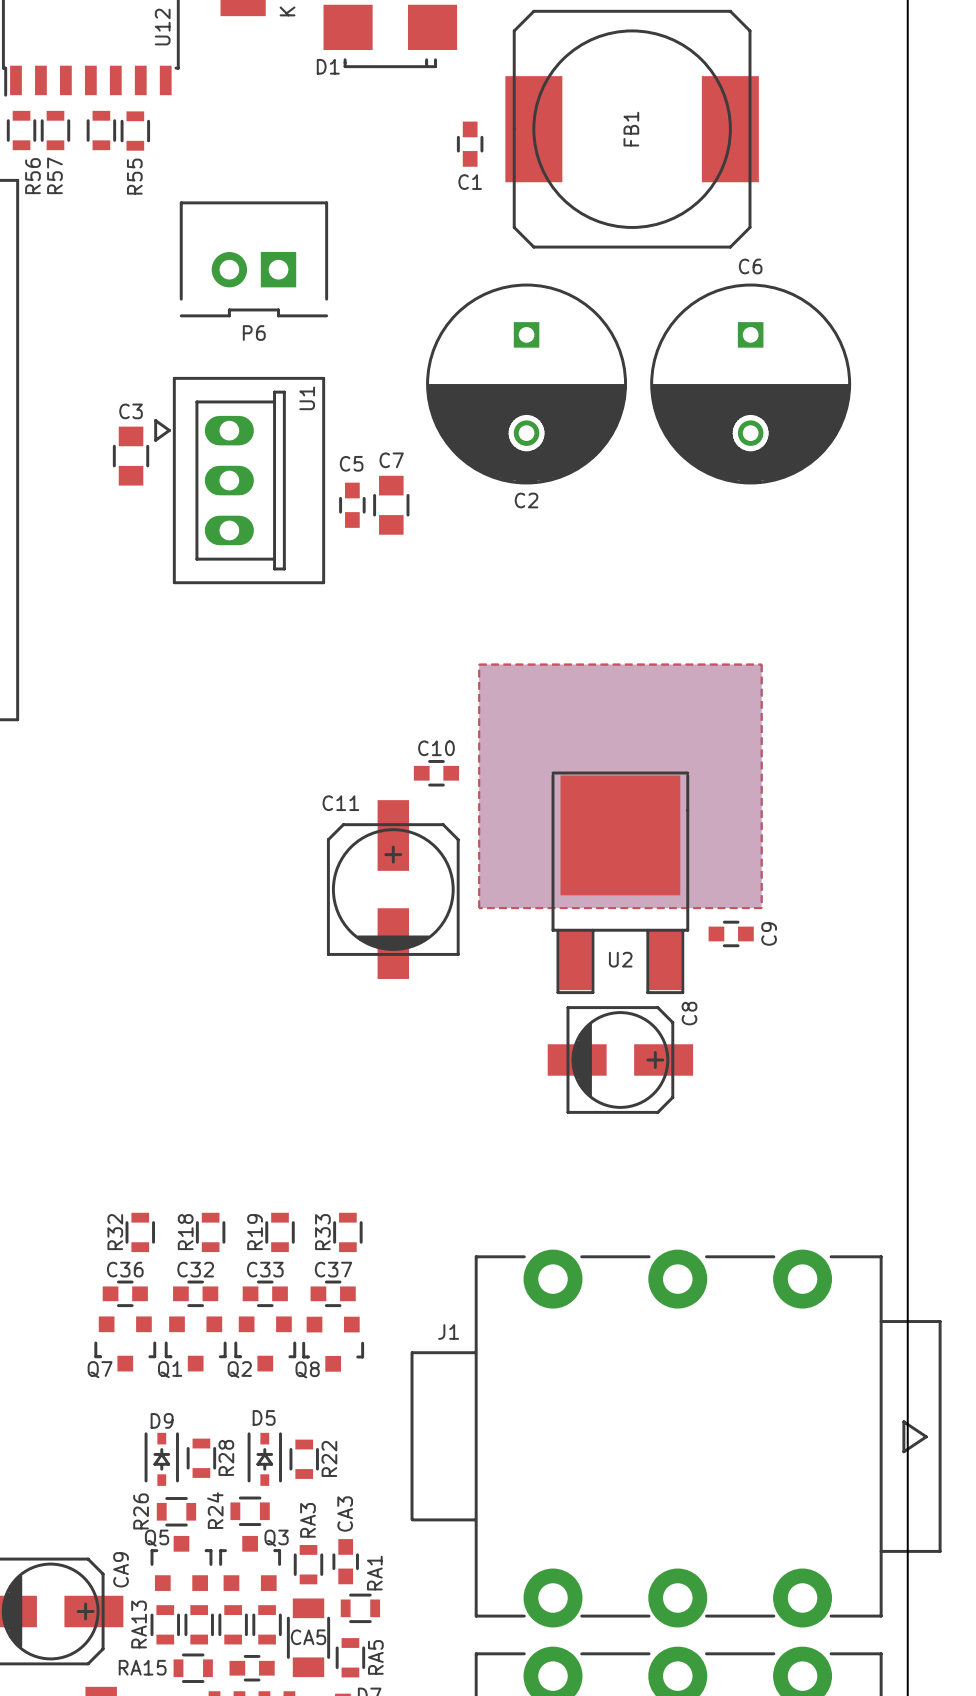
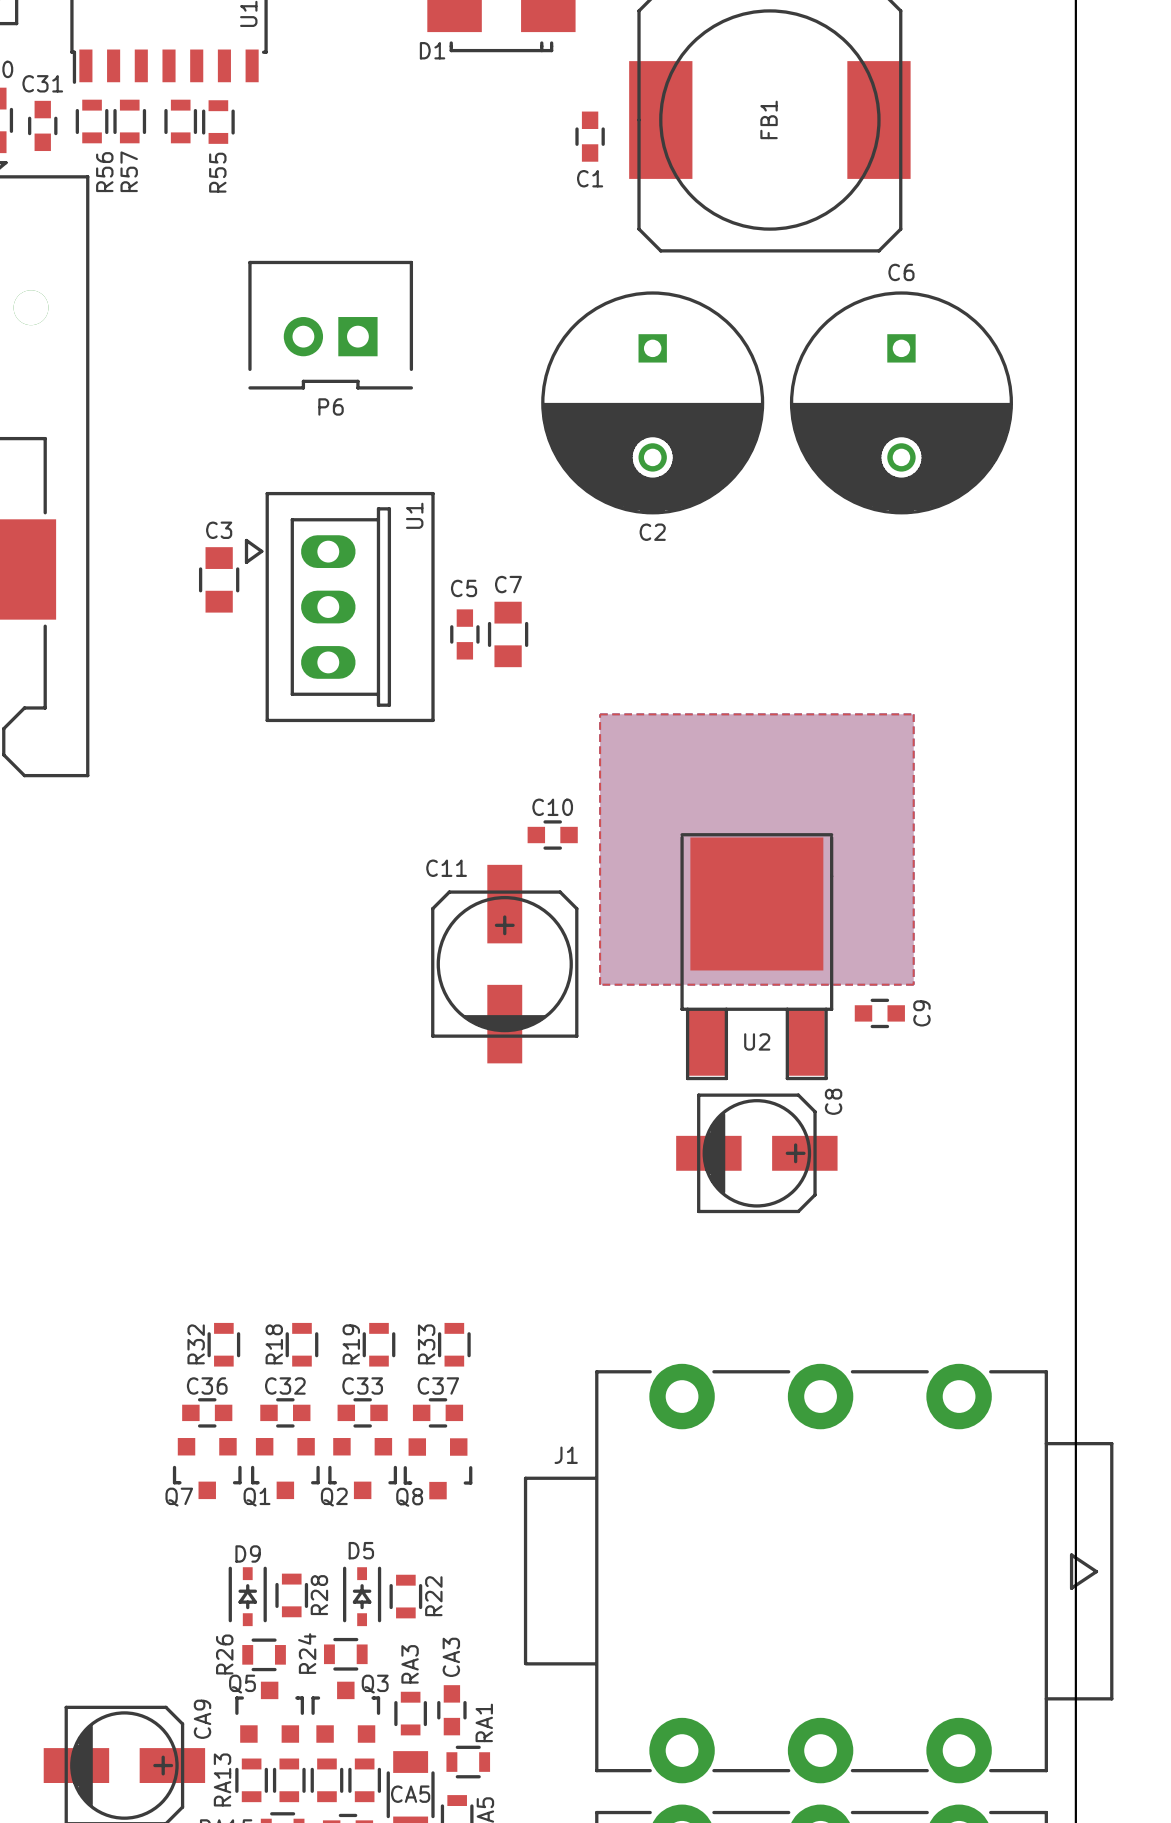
P6 position: (253, 259) -> (330, 325)
C3 position: (131, 456) -> (219, 579)
U1 position: (239, 480) -> (339, 607)
C5 position: (352, 505) -> (464, 634)
C7 position: (391, 505) -> (508, 634)

